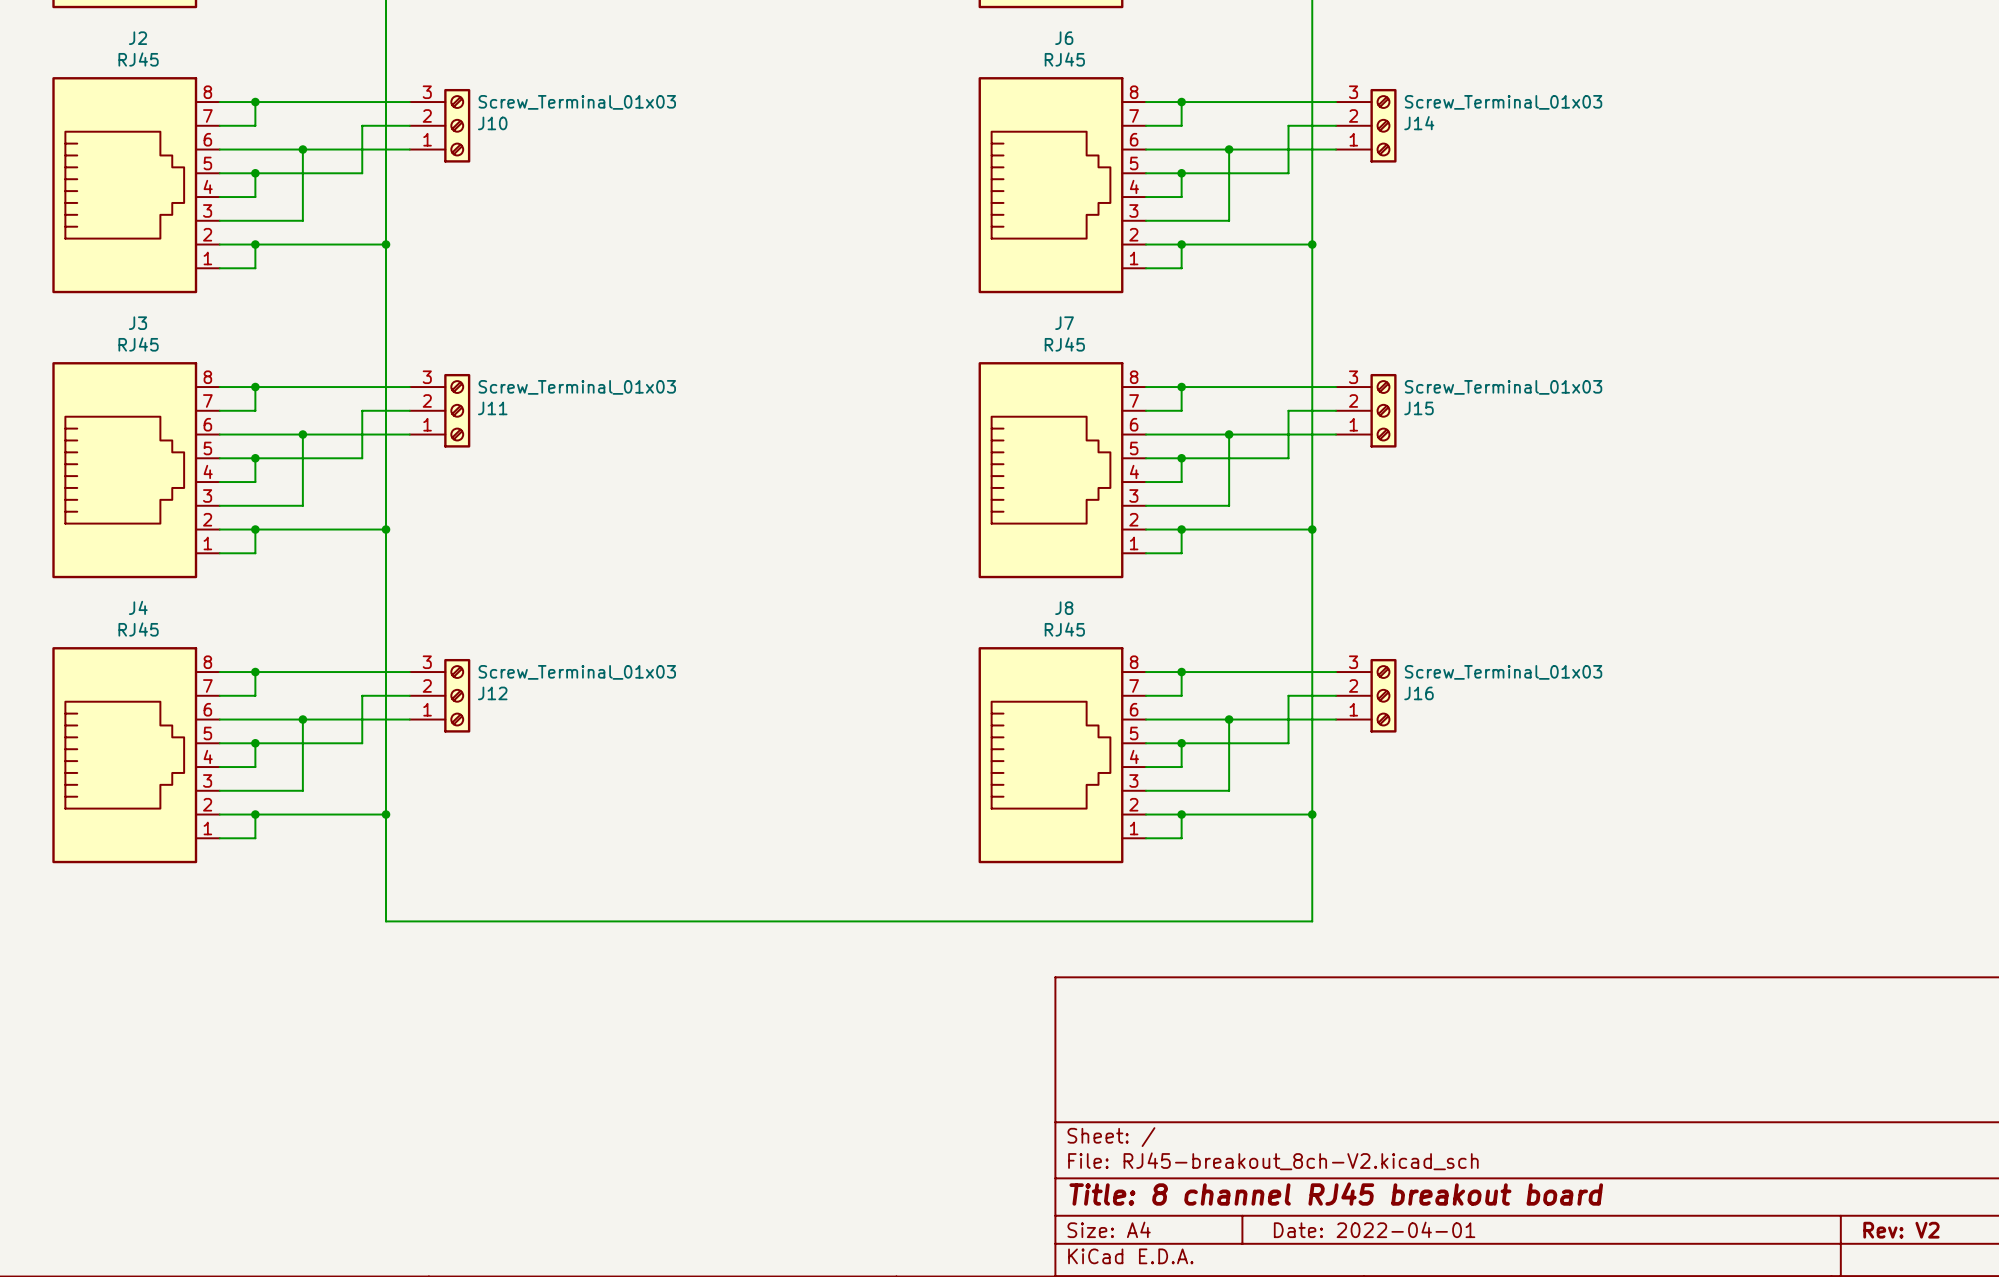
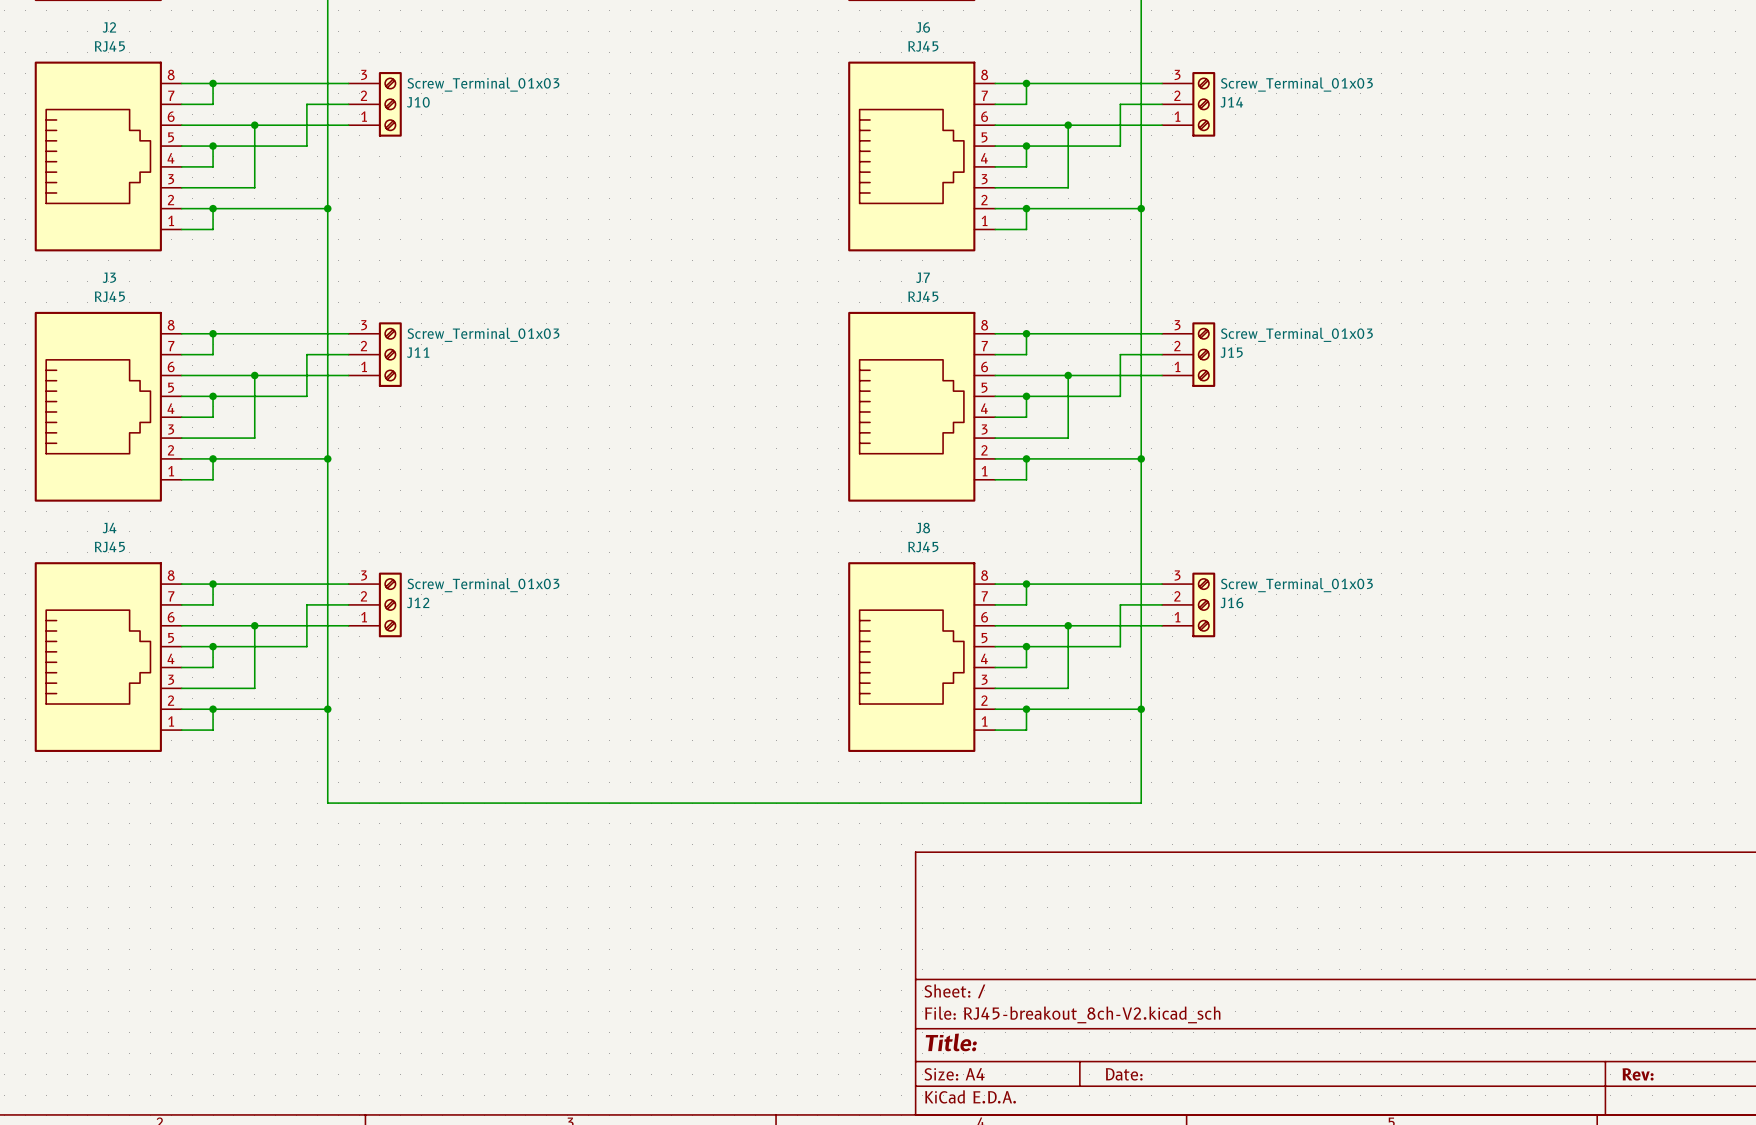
title block: Title: 8 channel RJ45 breakout board (1336, 1194) -> Title: (951, 1042)
title block: Date: 2022-04-01 (1374, 1229) -> Date: (1124, 1074)
title block: Rev: V2 (1901, 1230) -> Rev: (1638, 1074)

